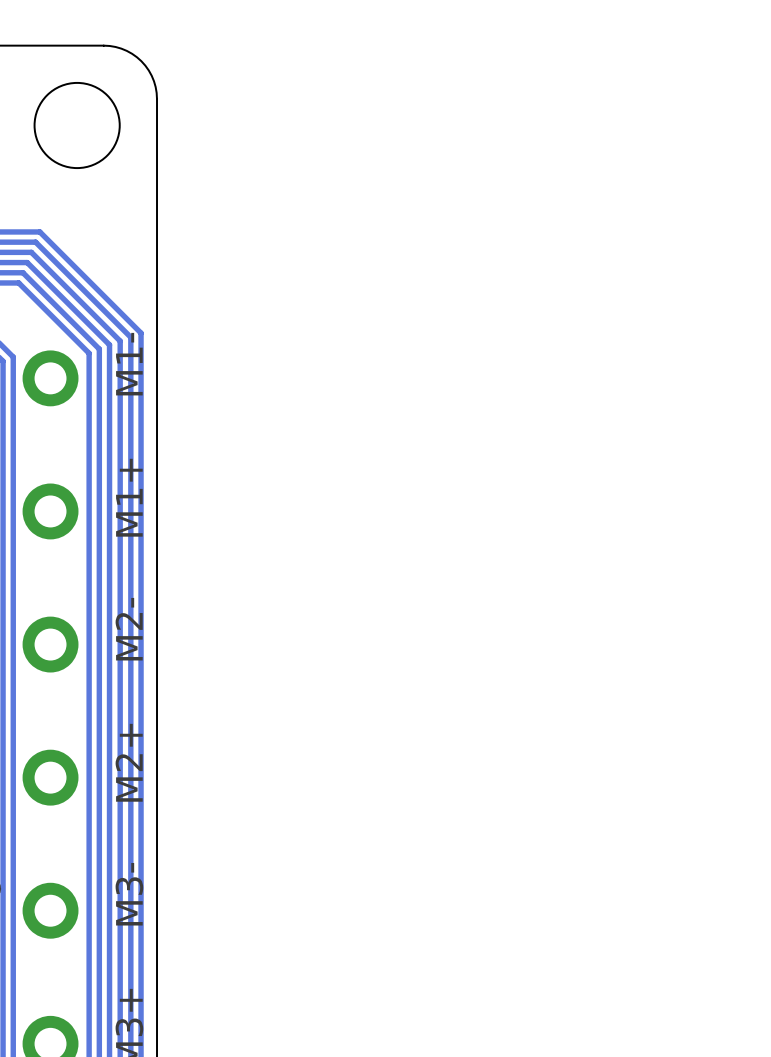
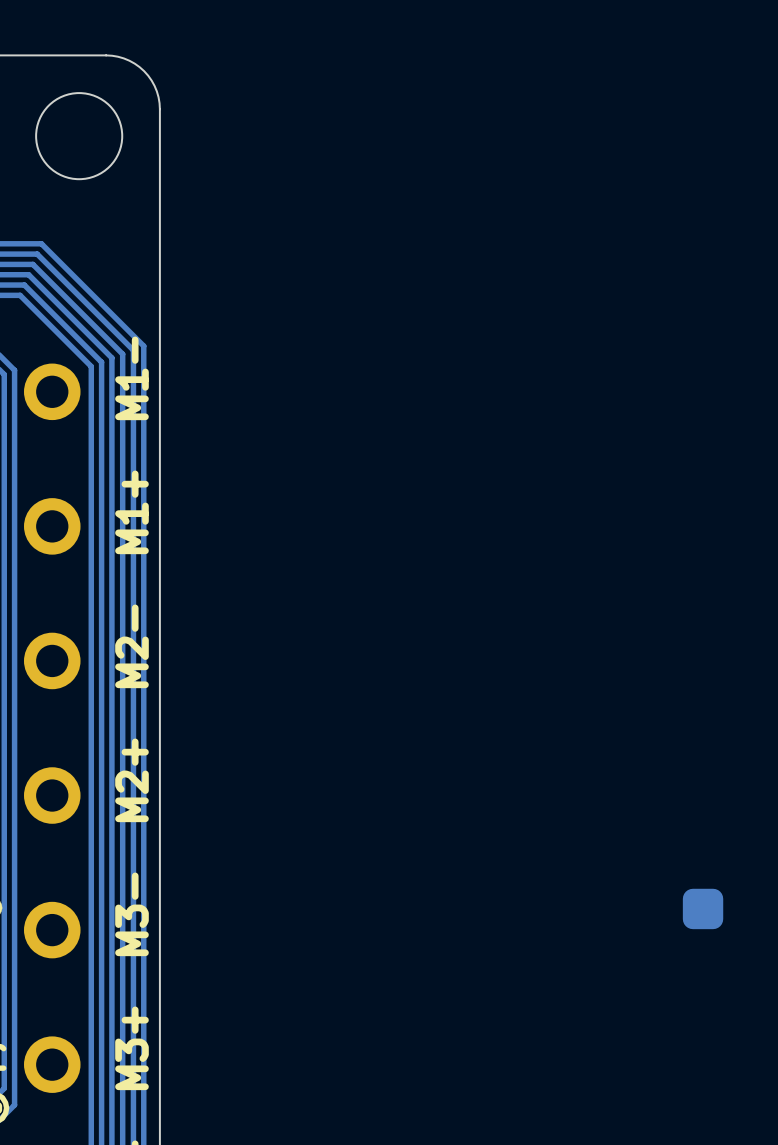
part: none -> (703, 908)

